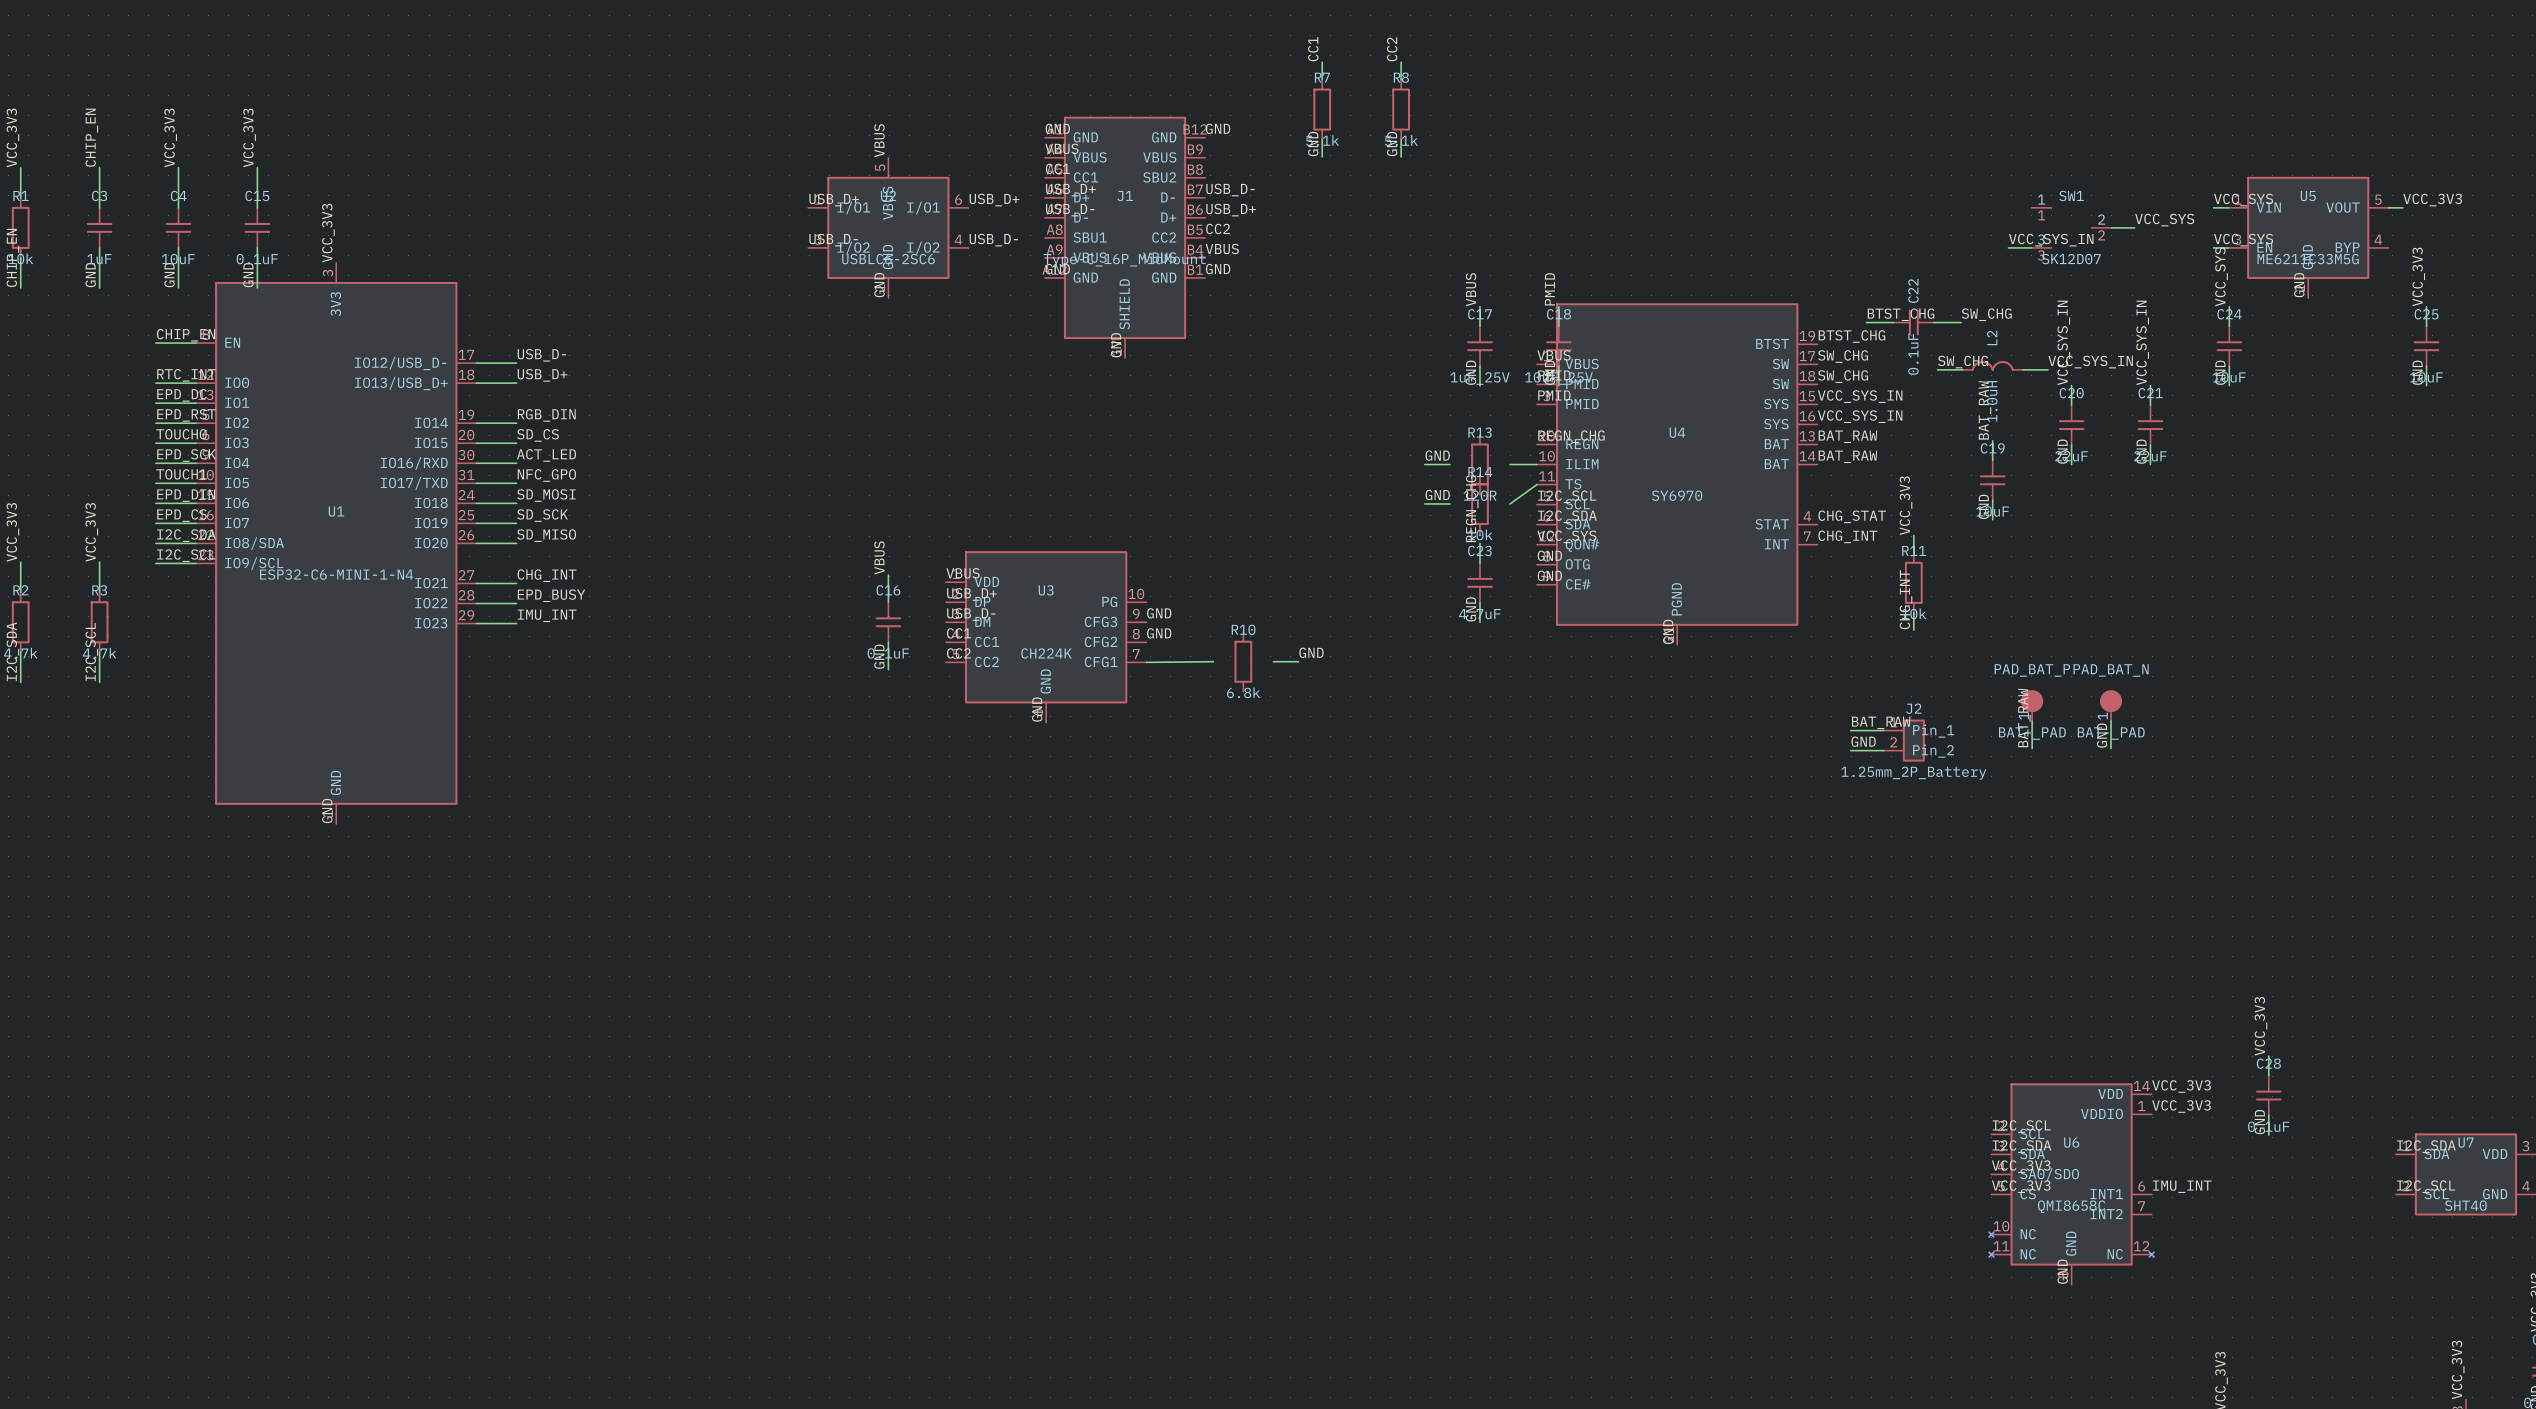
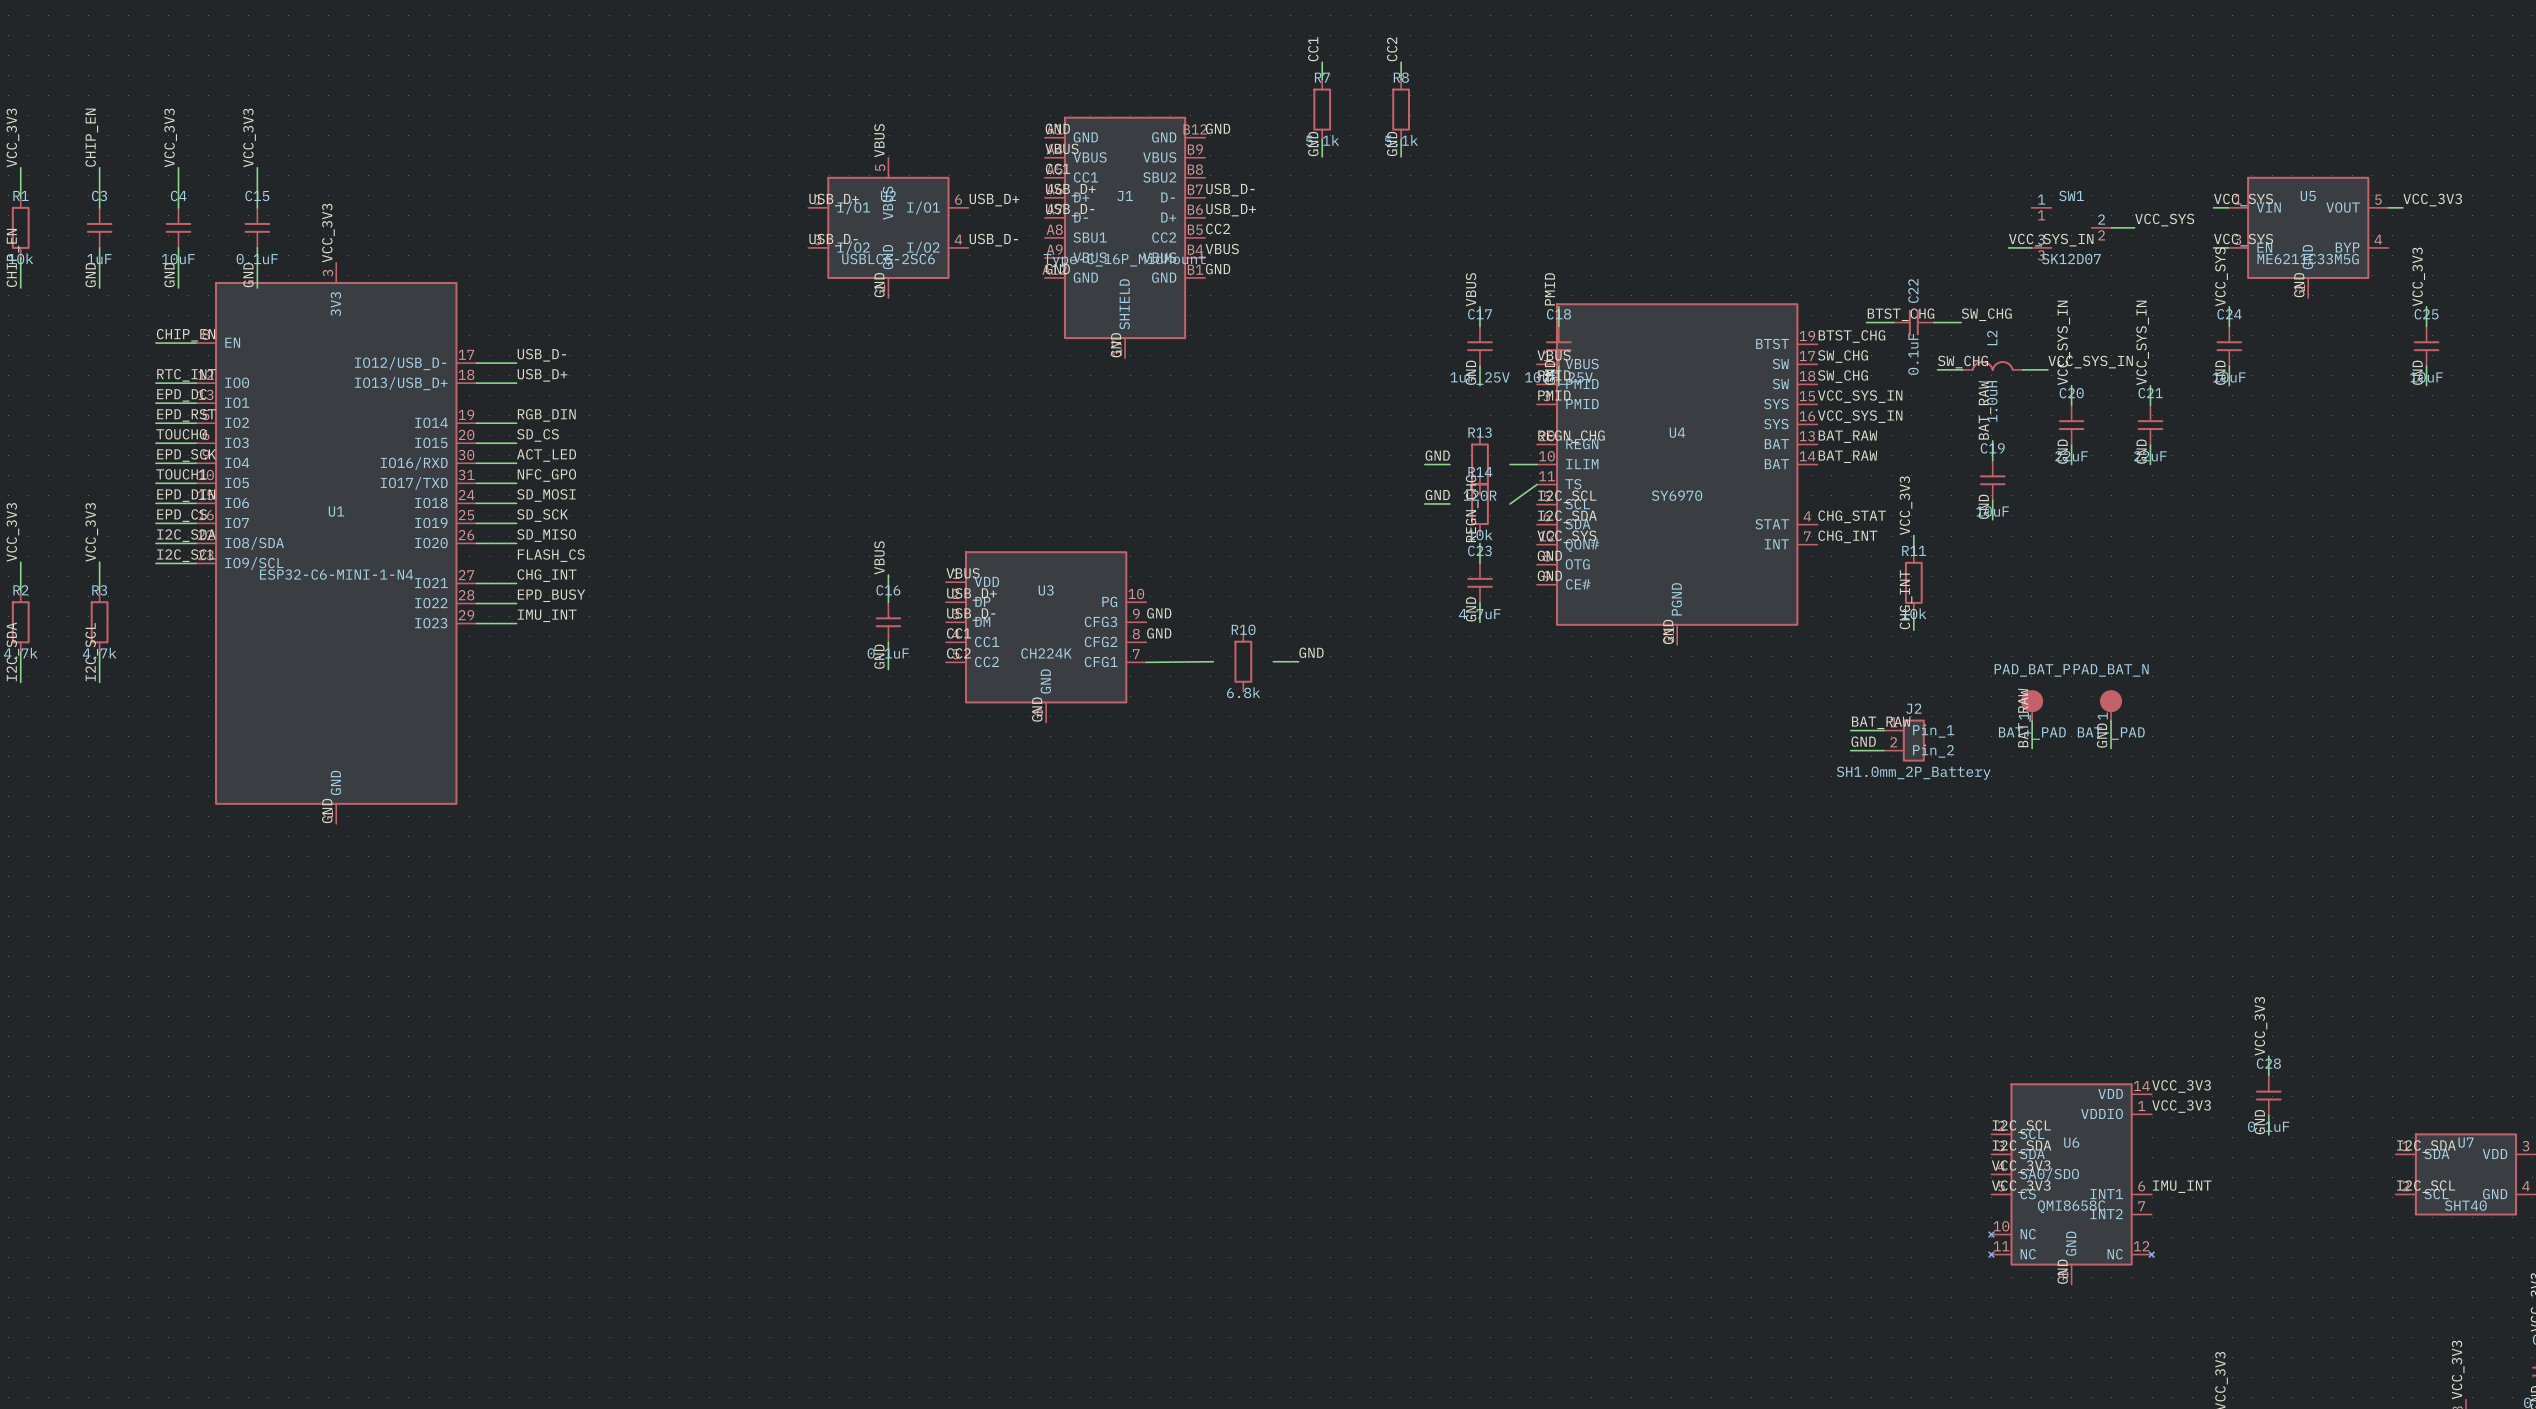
label: none -> FLASH_CS (551, 555)
J2 value: 1.25mm_2P_Battery (1913, 773) -> SH1.0mm_2P_Battery (1913, 773)

